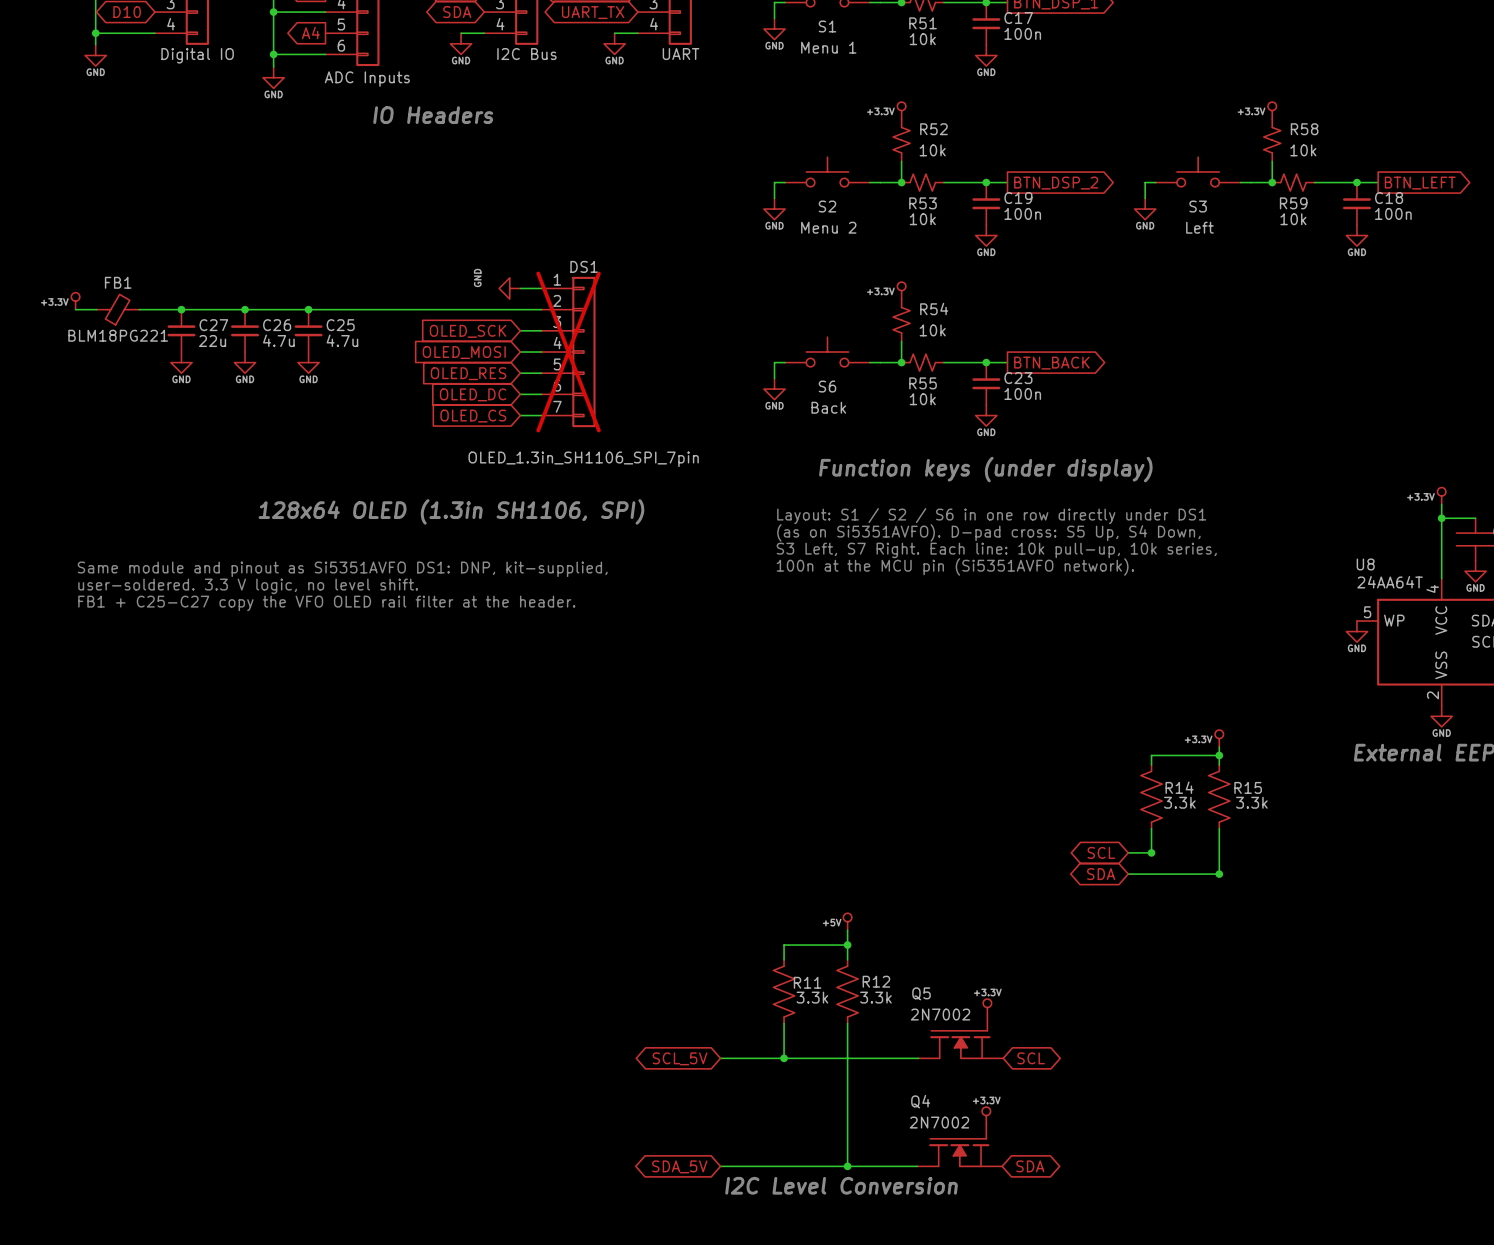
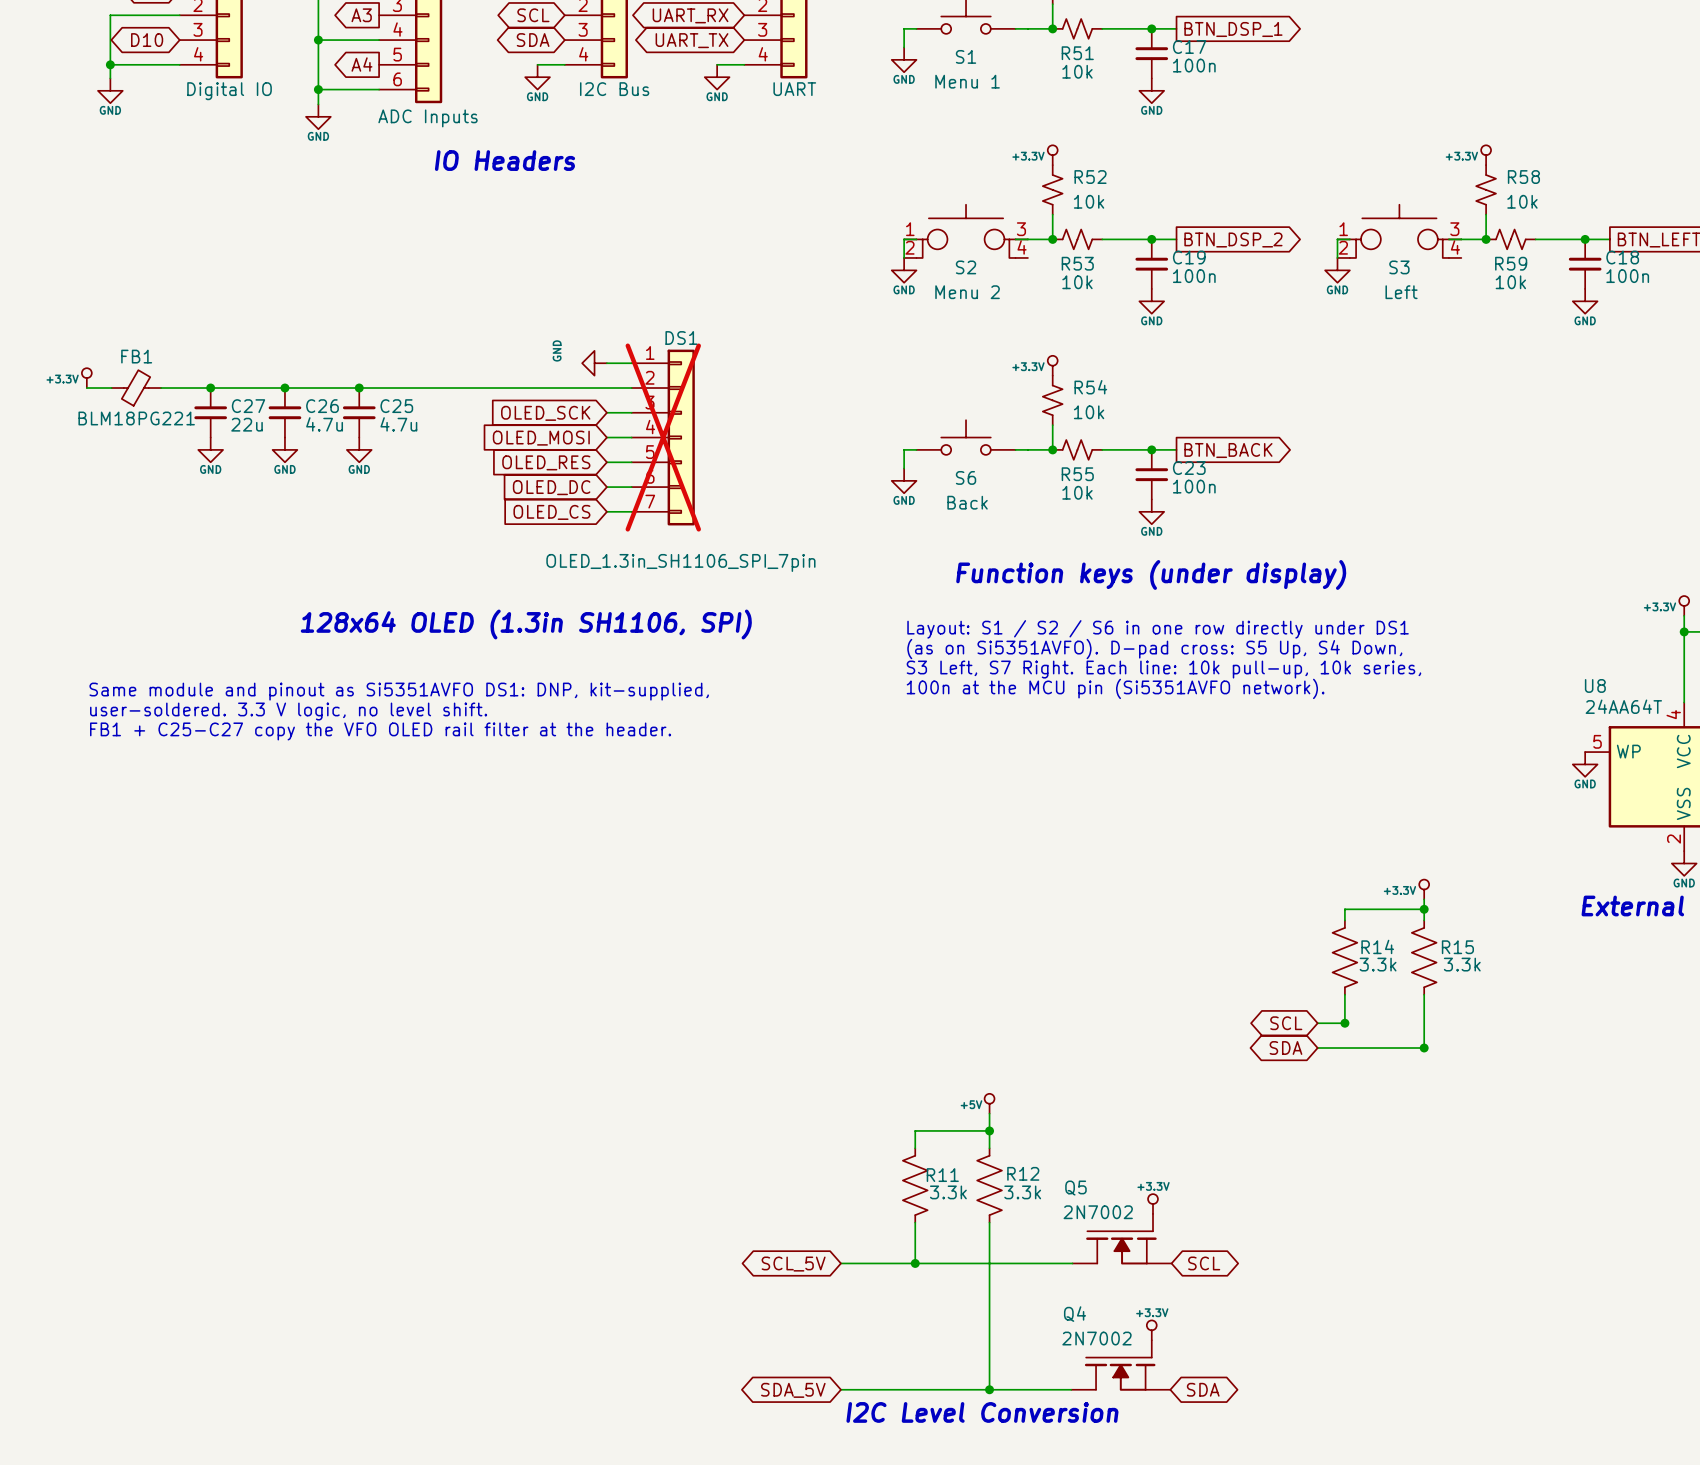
S2 symbol: [785, 157, 870, 187] -> [904, 204, 1028, 258]
S3 symbol: [1155, 157, 1241, 187] -> [1337, 204, 1462, 258]

